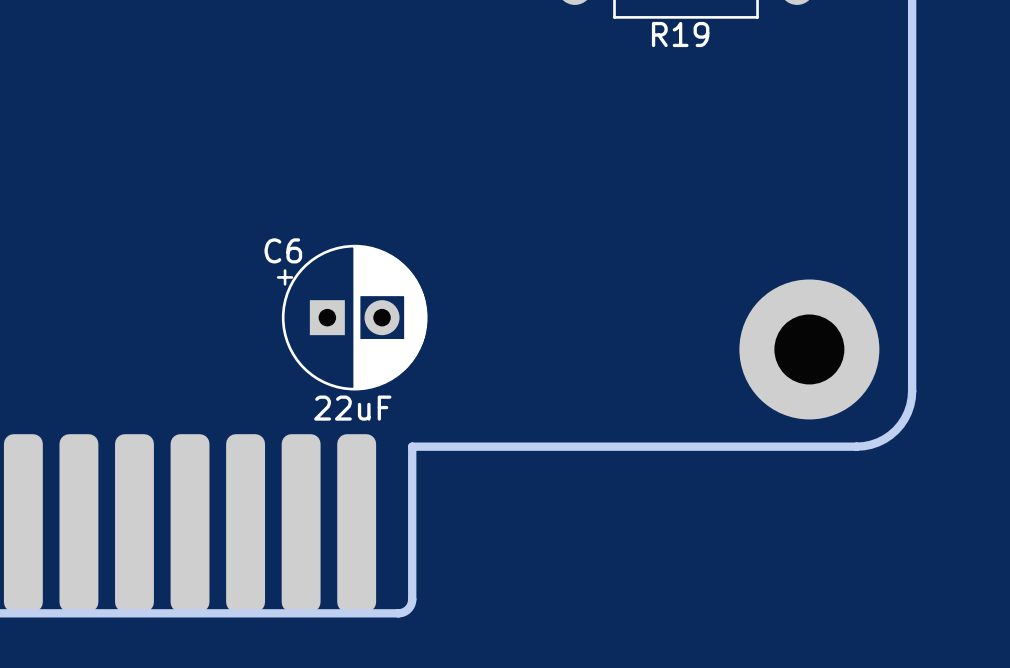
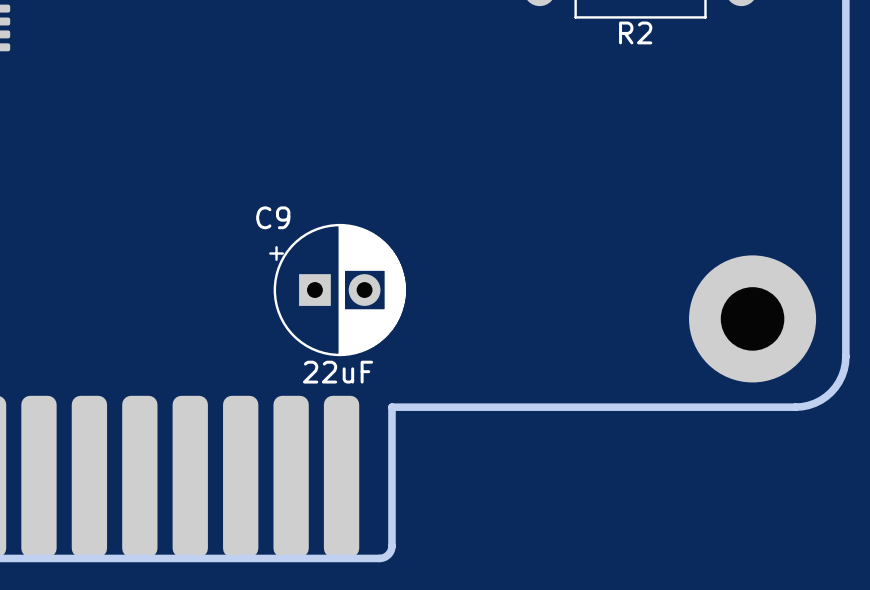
R19 name: R19 (680, 34) -> R2 (635, 32)
C6 name: C6 (283, 250) -> C9 (273, 217)

